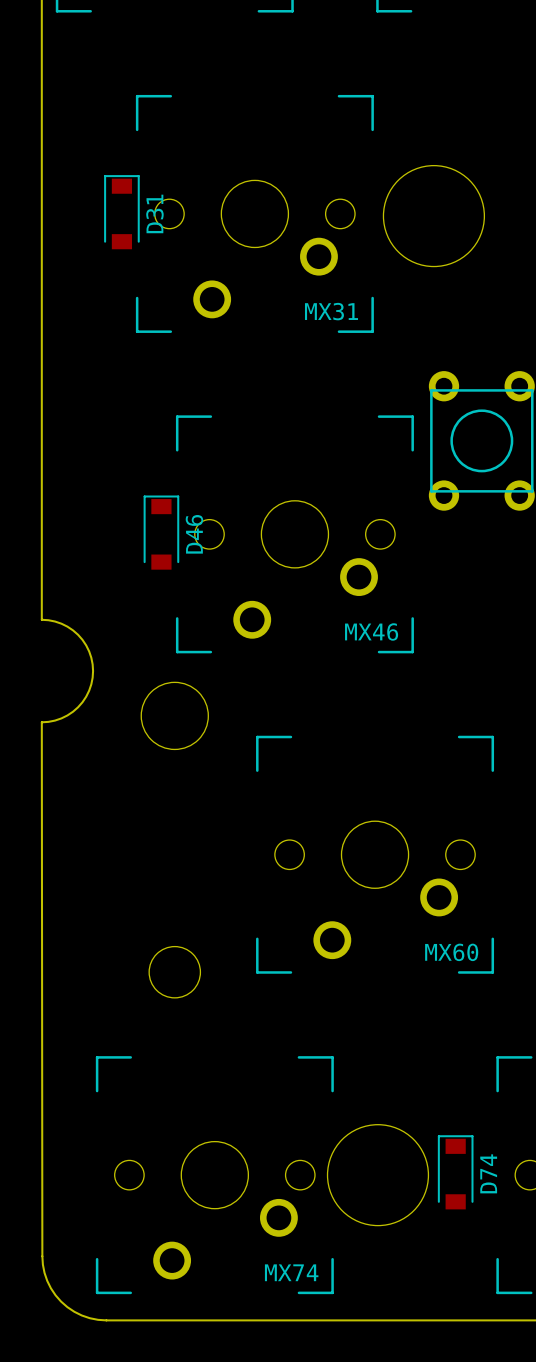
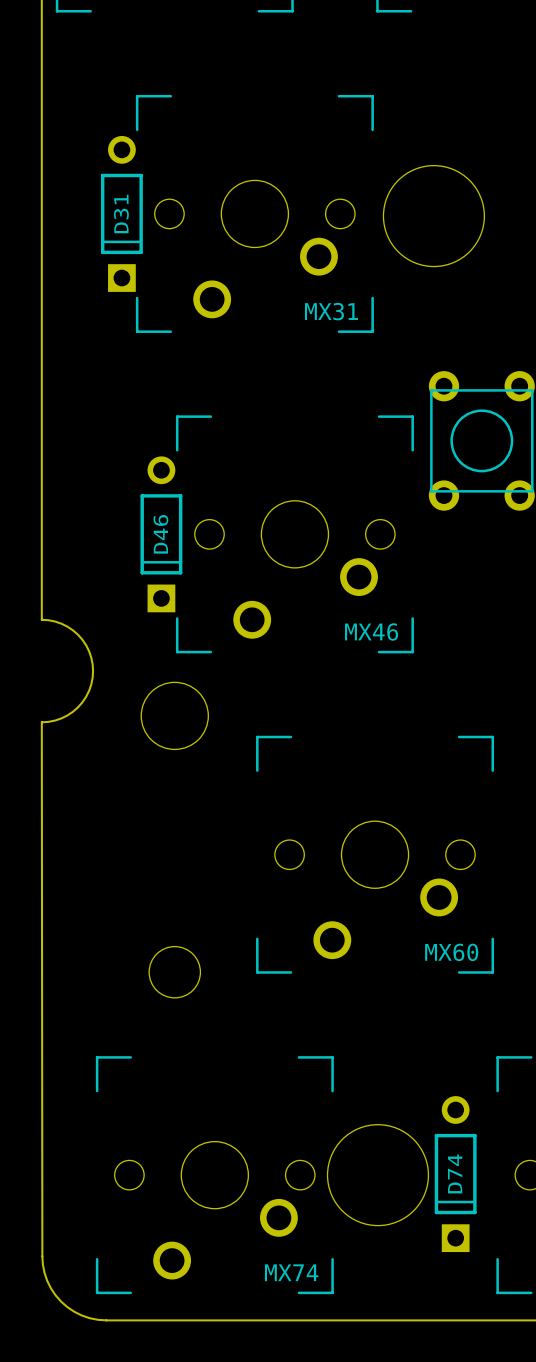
D31 footprint: [104, 175, 140, 250] -> [100, 135, 143, 292]
D31 name position: D31 (154, 213) -> D31 (121, 213)
D46 footprint: [143, 495, 180, 570] -> [140, 456, 183, 613]
D46 name position: D46 (194, 534) -> D46 (160, 534)
D74 footprint: [437, 1135, 474, 1210] -> [434, 1096, 477, 1253]
D74 name position: D74 (488, 1173) -> D74 (455, 1173)

